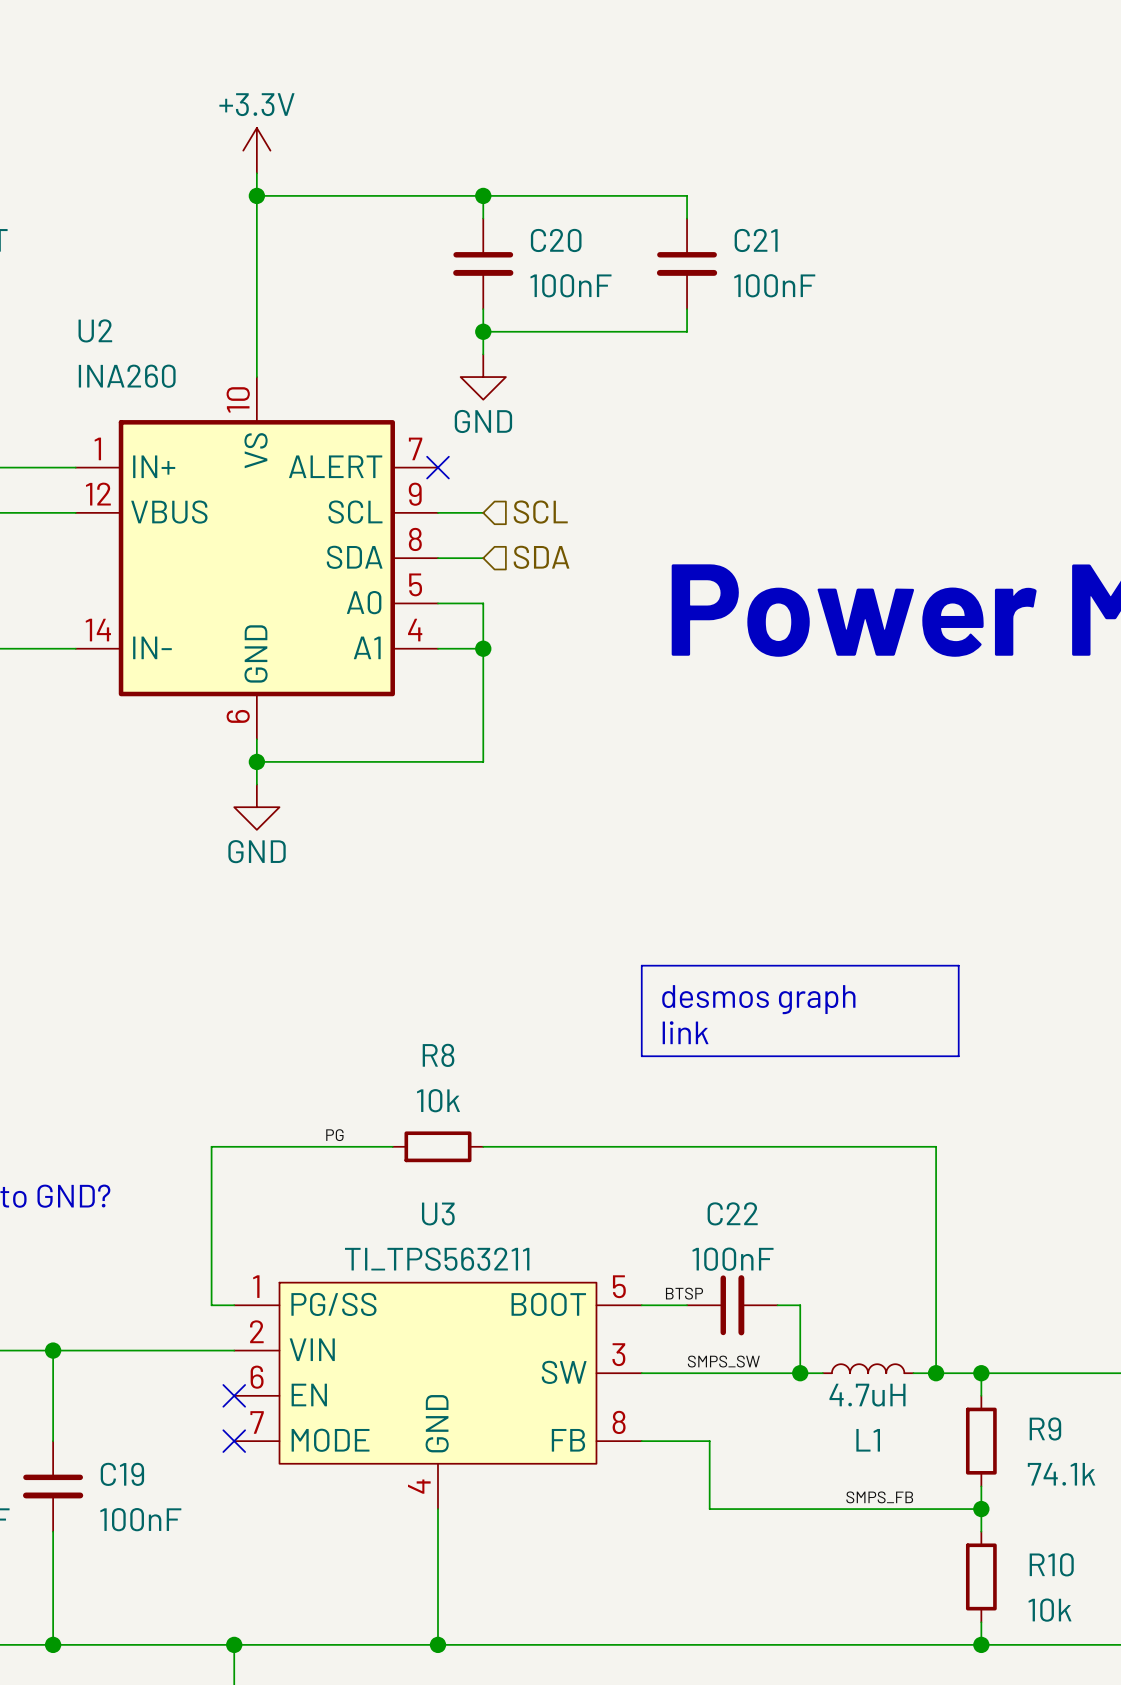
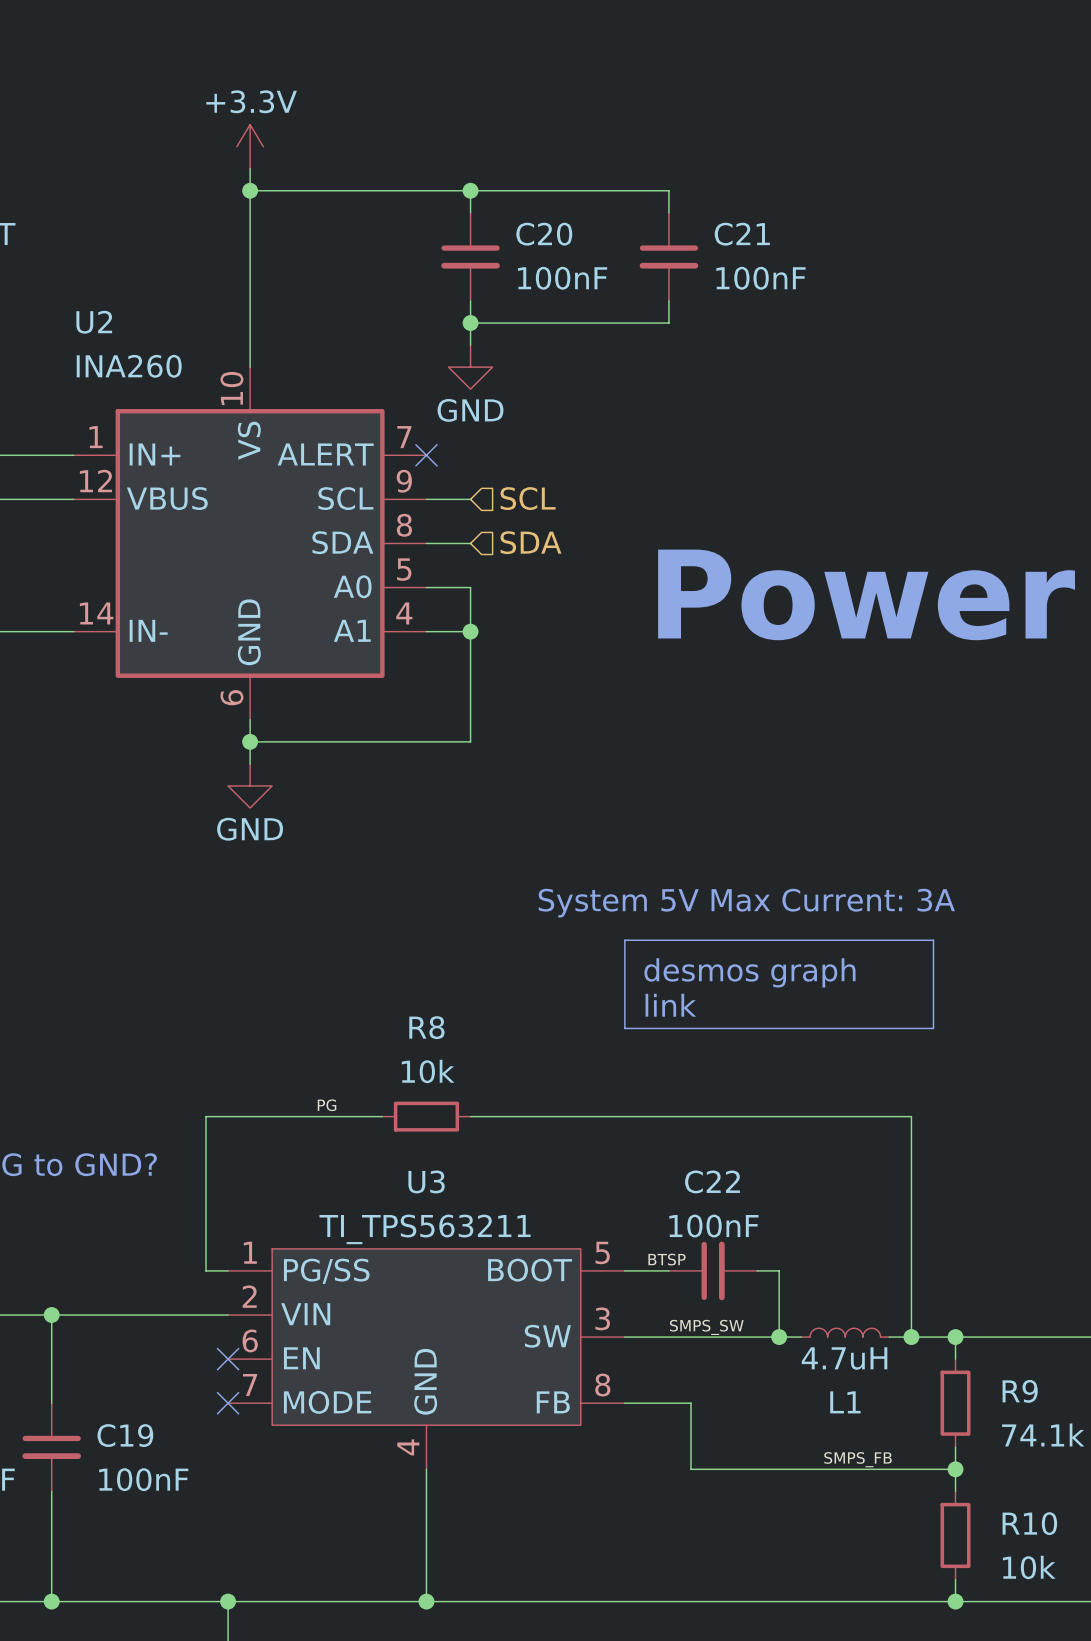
text: none -> System 5V Max Current: 3A (746, 903)

